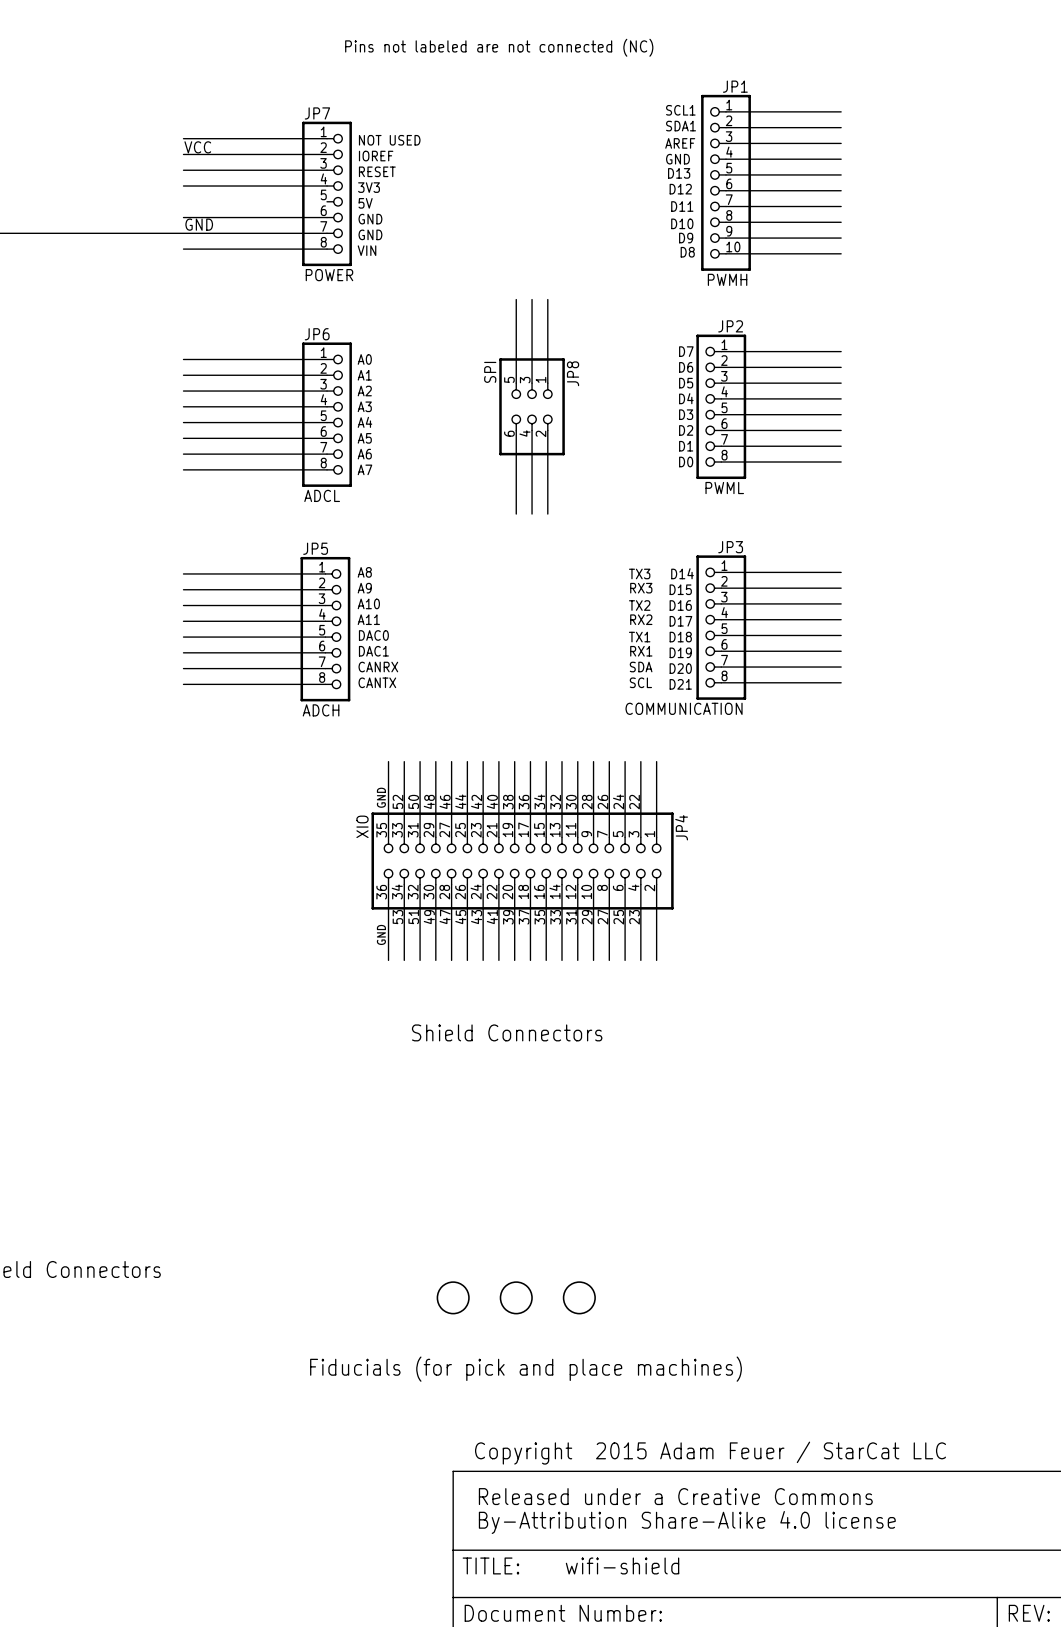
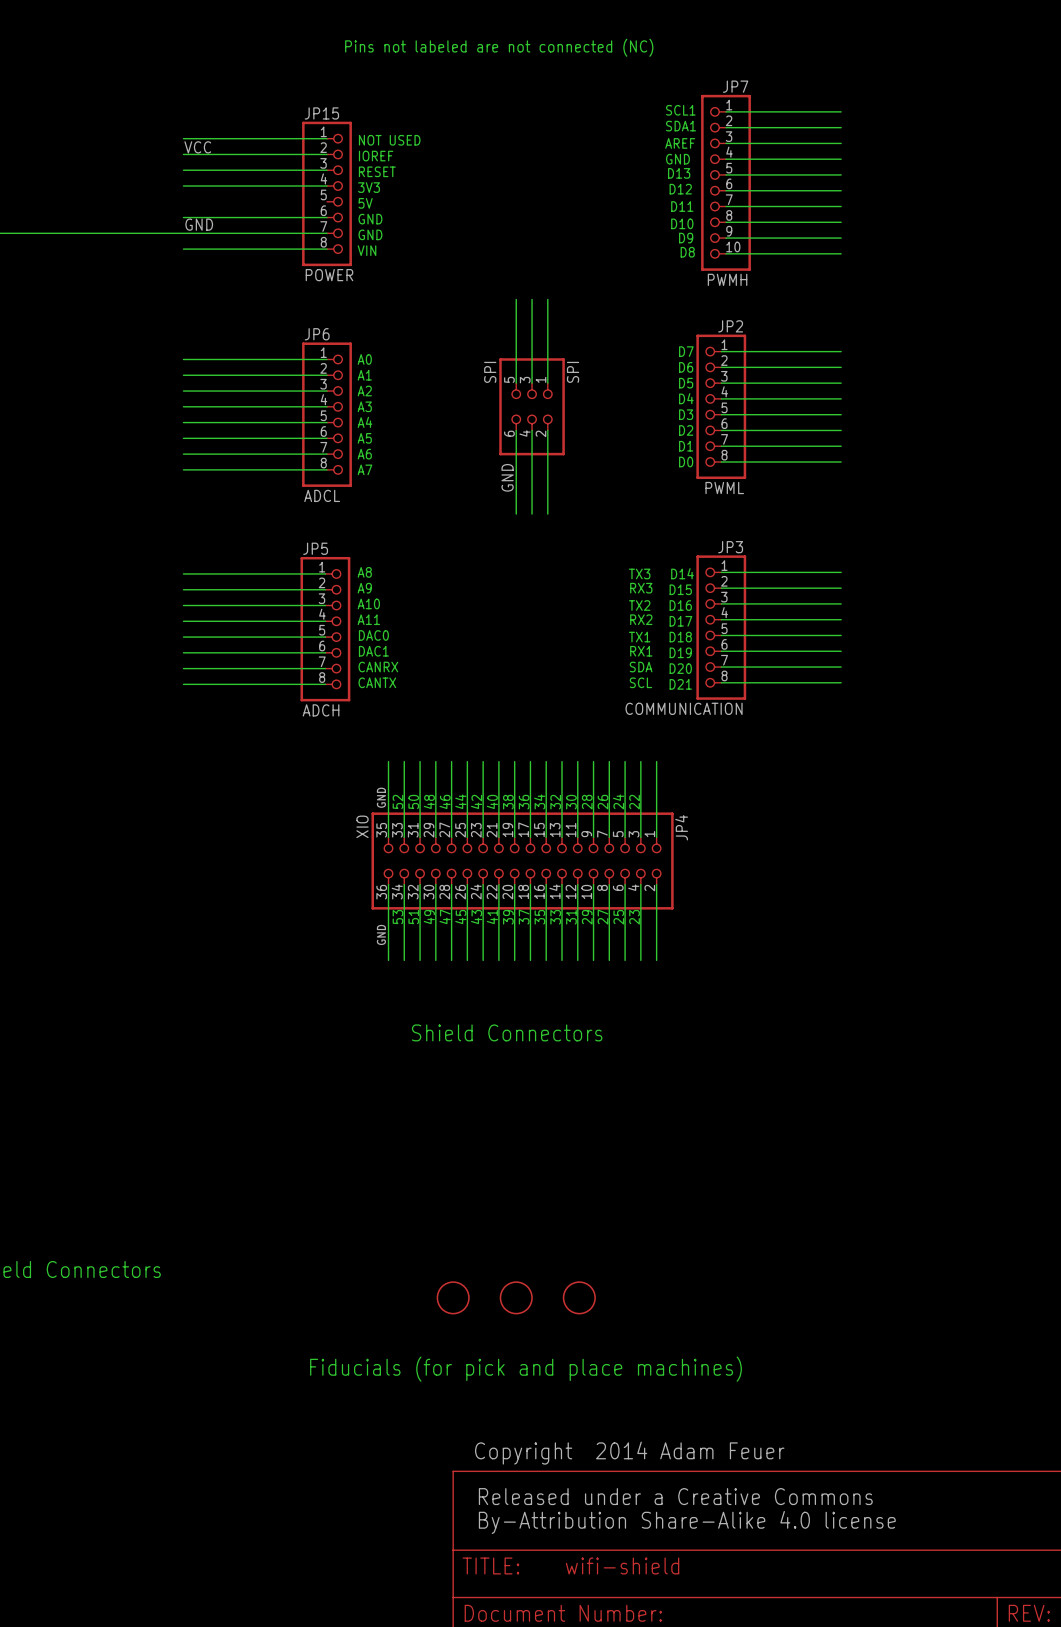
JP1 name: JP1 (735, 86) -> JP7 (735, 86)
JP7 name: JP7 (317, 113) -> JP15 (321, 113)
JP8 name: JP8 (573, 373) -> SPI (573, 372)
label: none -> GND (507, 477)
text: Copyright 2015 Adam Feuer / StarCat LLC (710, 1453) -> Copyright 2014 Adam Feuer (629, 1453)

